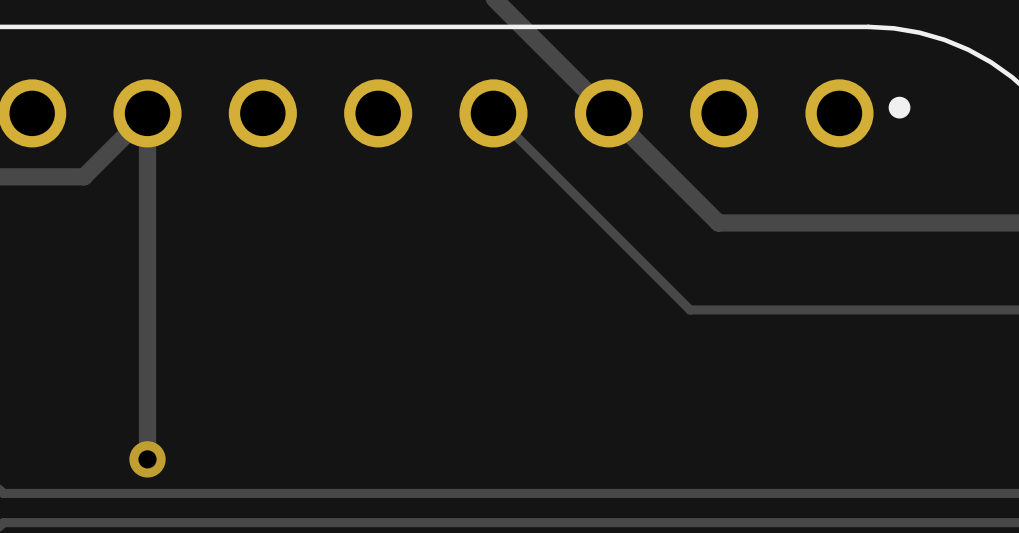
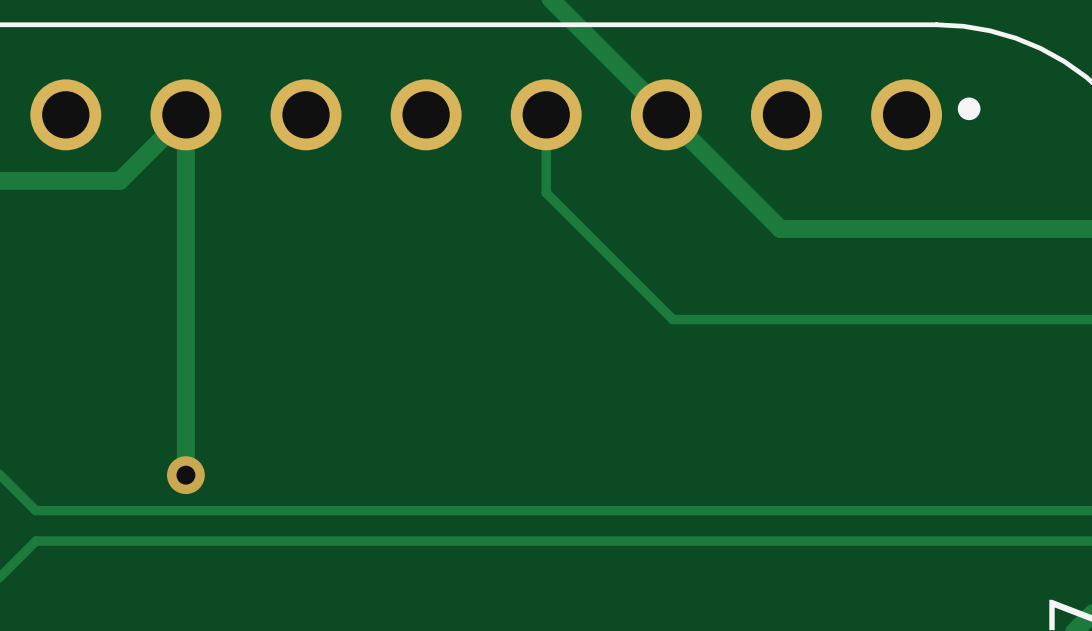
track: (493, 113) (690, 309) -> (546, 114) (546, 192) (672, 319) (750, 319)

